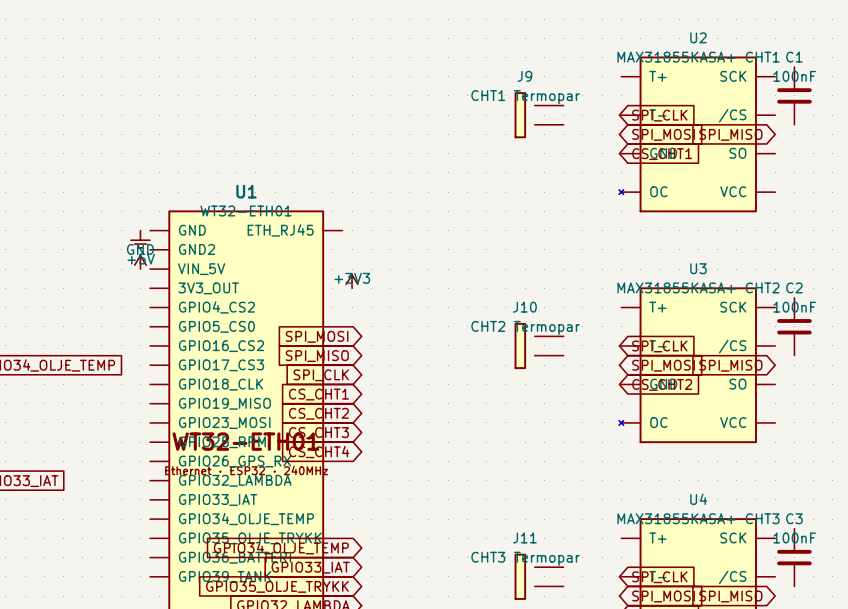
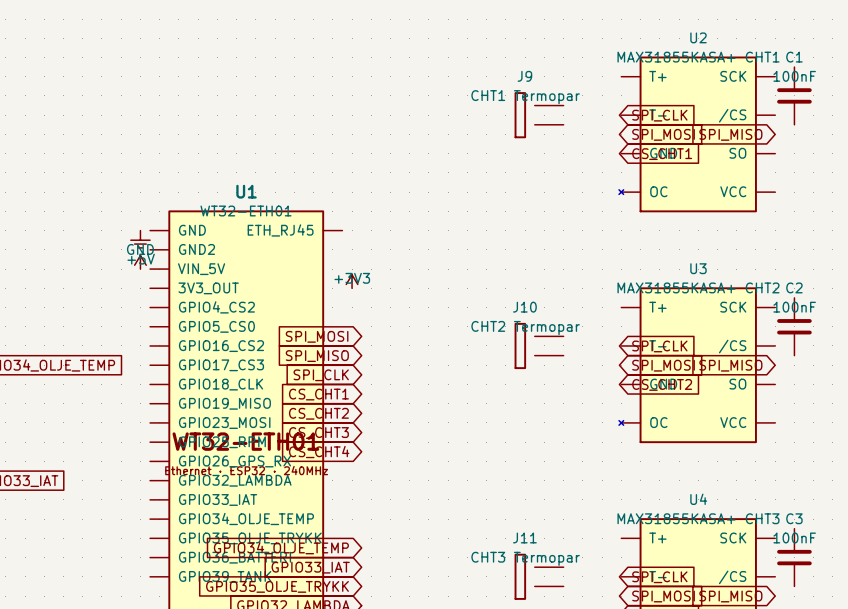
J9 symbol: [514, 92, 564, 139] -> [514, 92, 564, 139]
J10 symbol: [514, 322, 564, 370] -> [514, 322, 564, 370]
J11 symbol: [514, 553, 564, 600] -> [514, 553, 564, 600]

